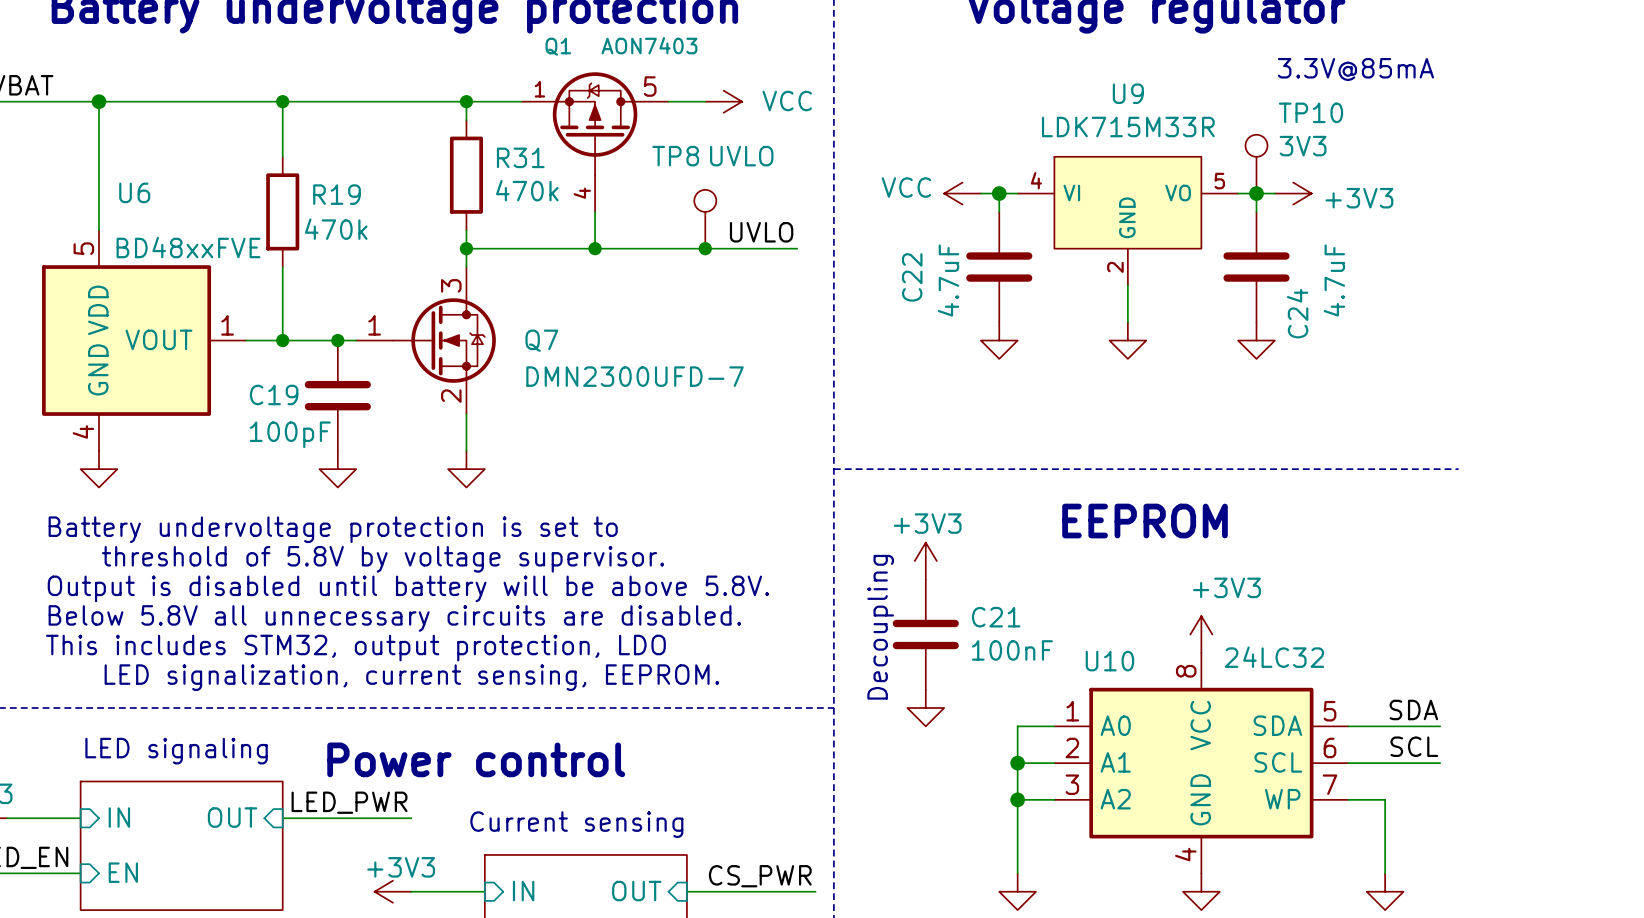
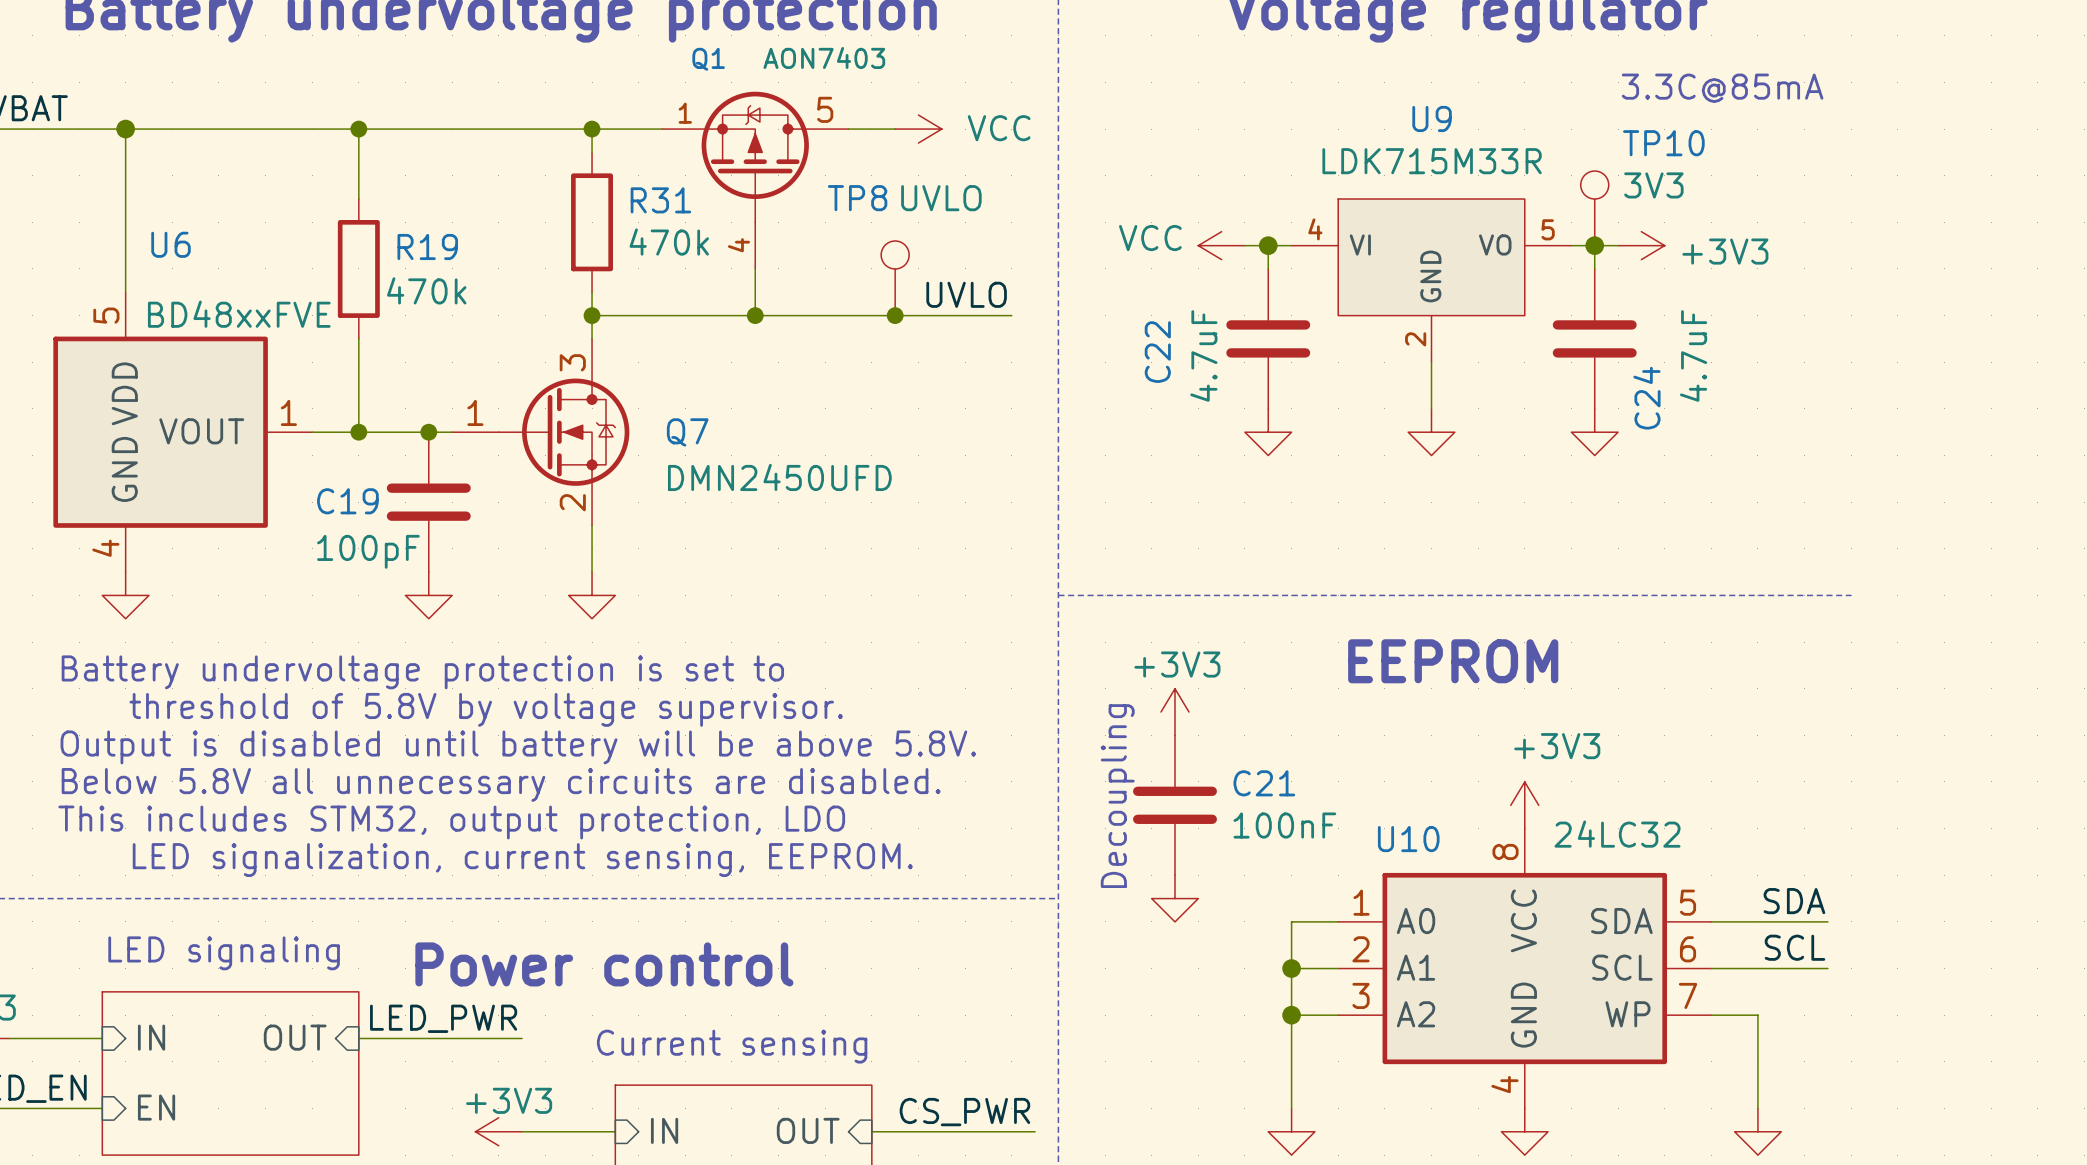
text: 3.3V@85mA (1355, 69) -> 3.3C@85mA (1722, 88)
Q7 value: DMN2300UFD-7 (635, 376) -> DMN2450UFD (779, 477)

